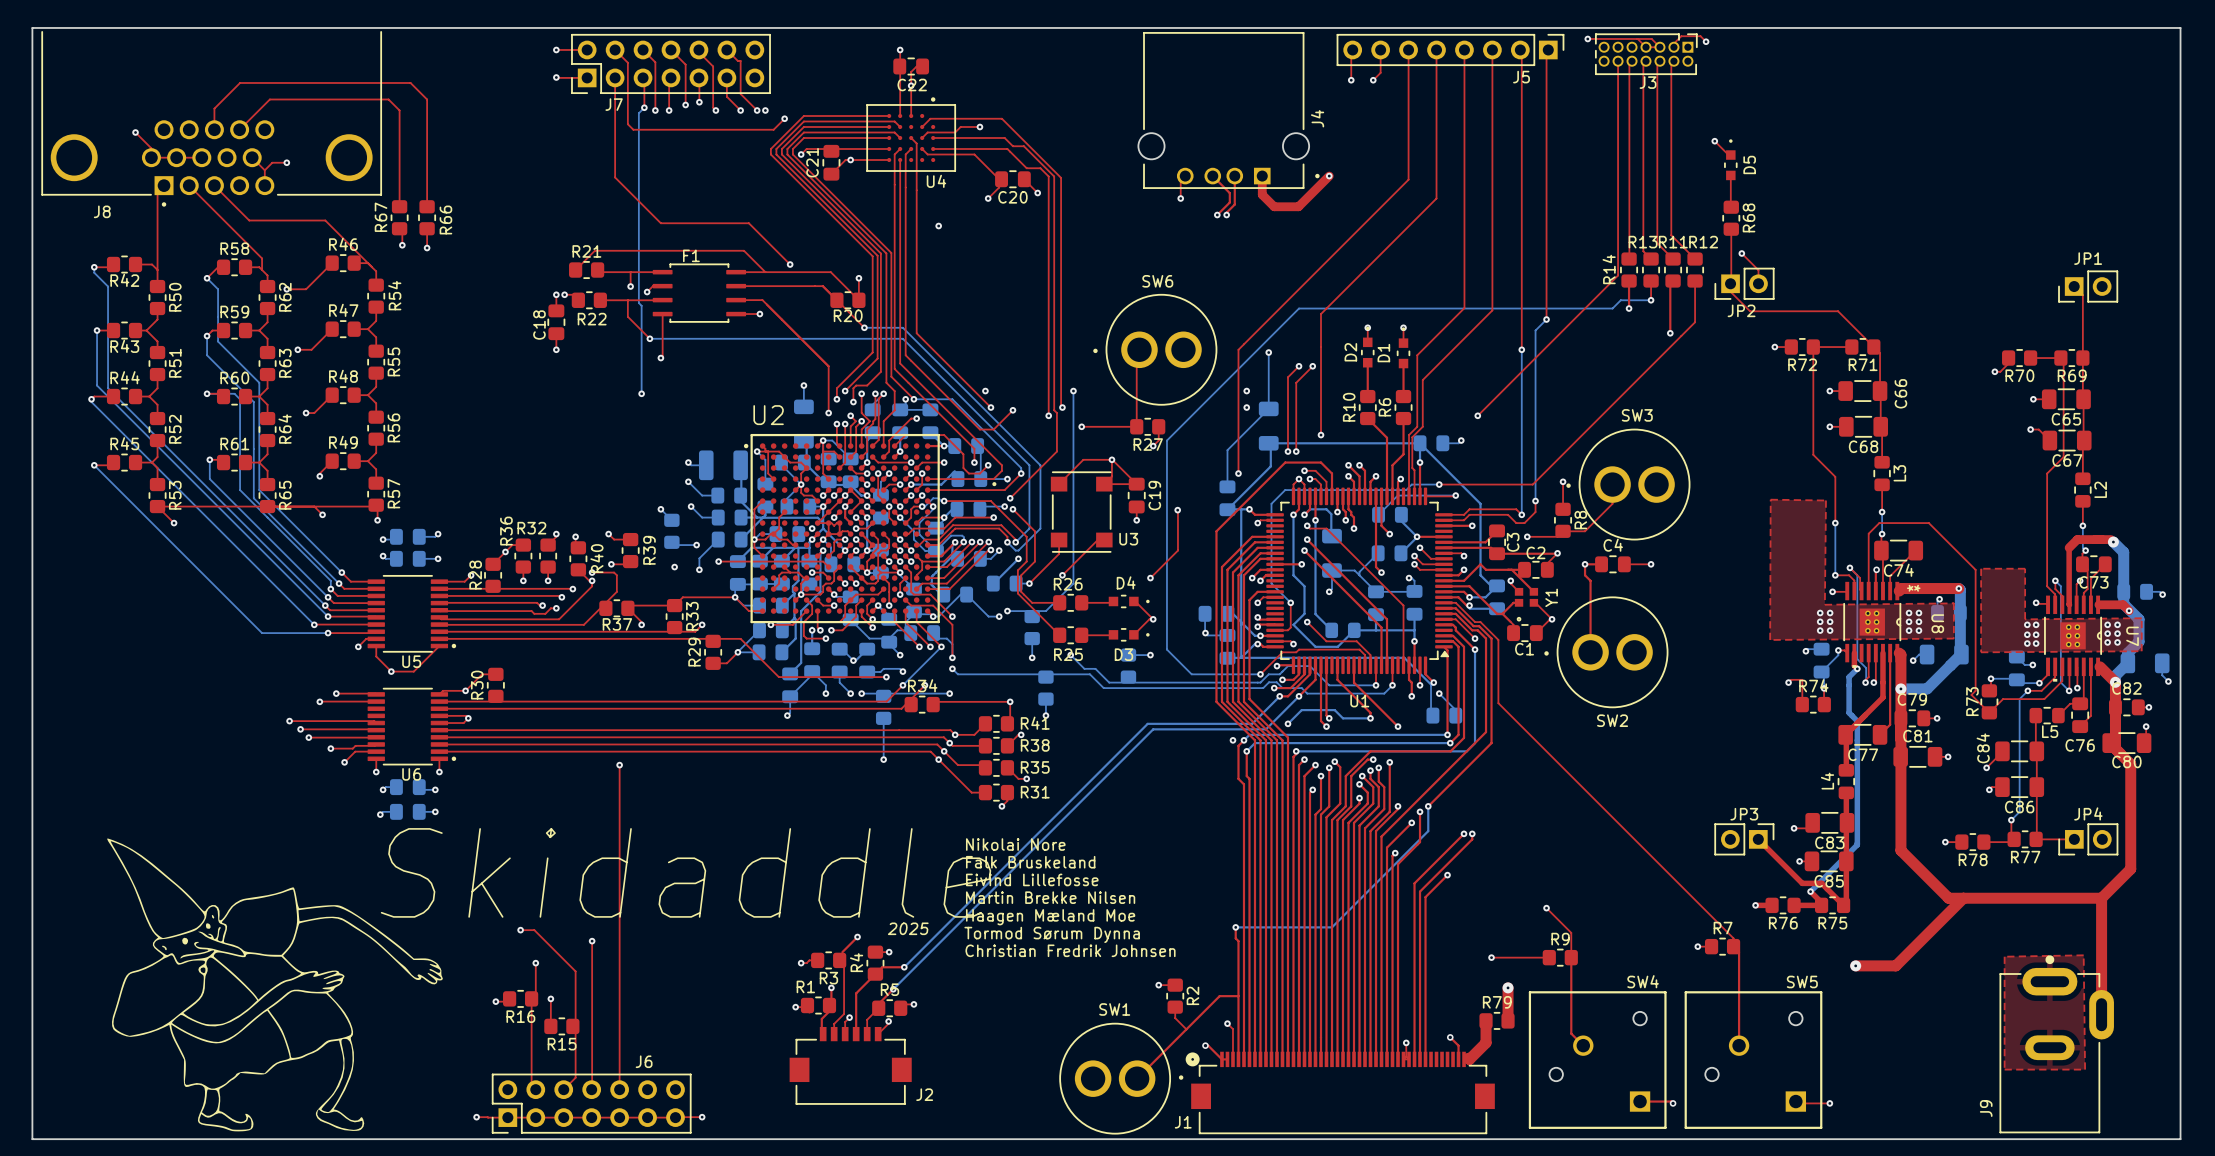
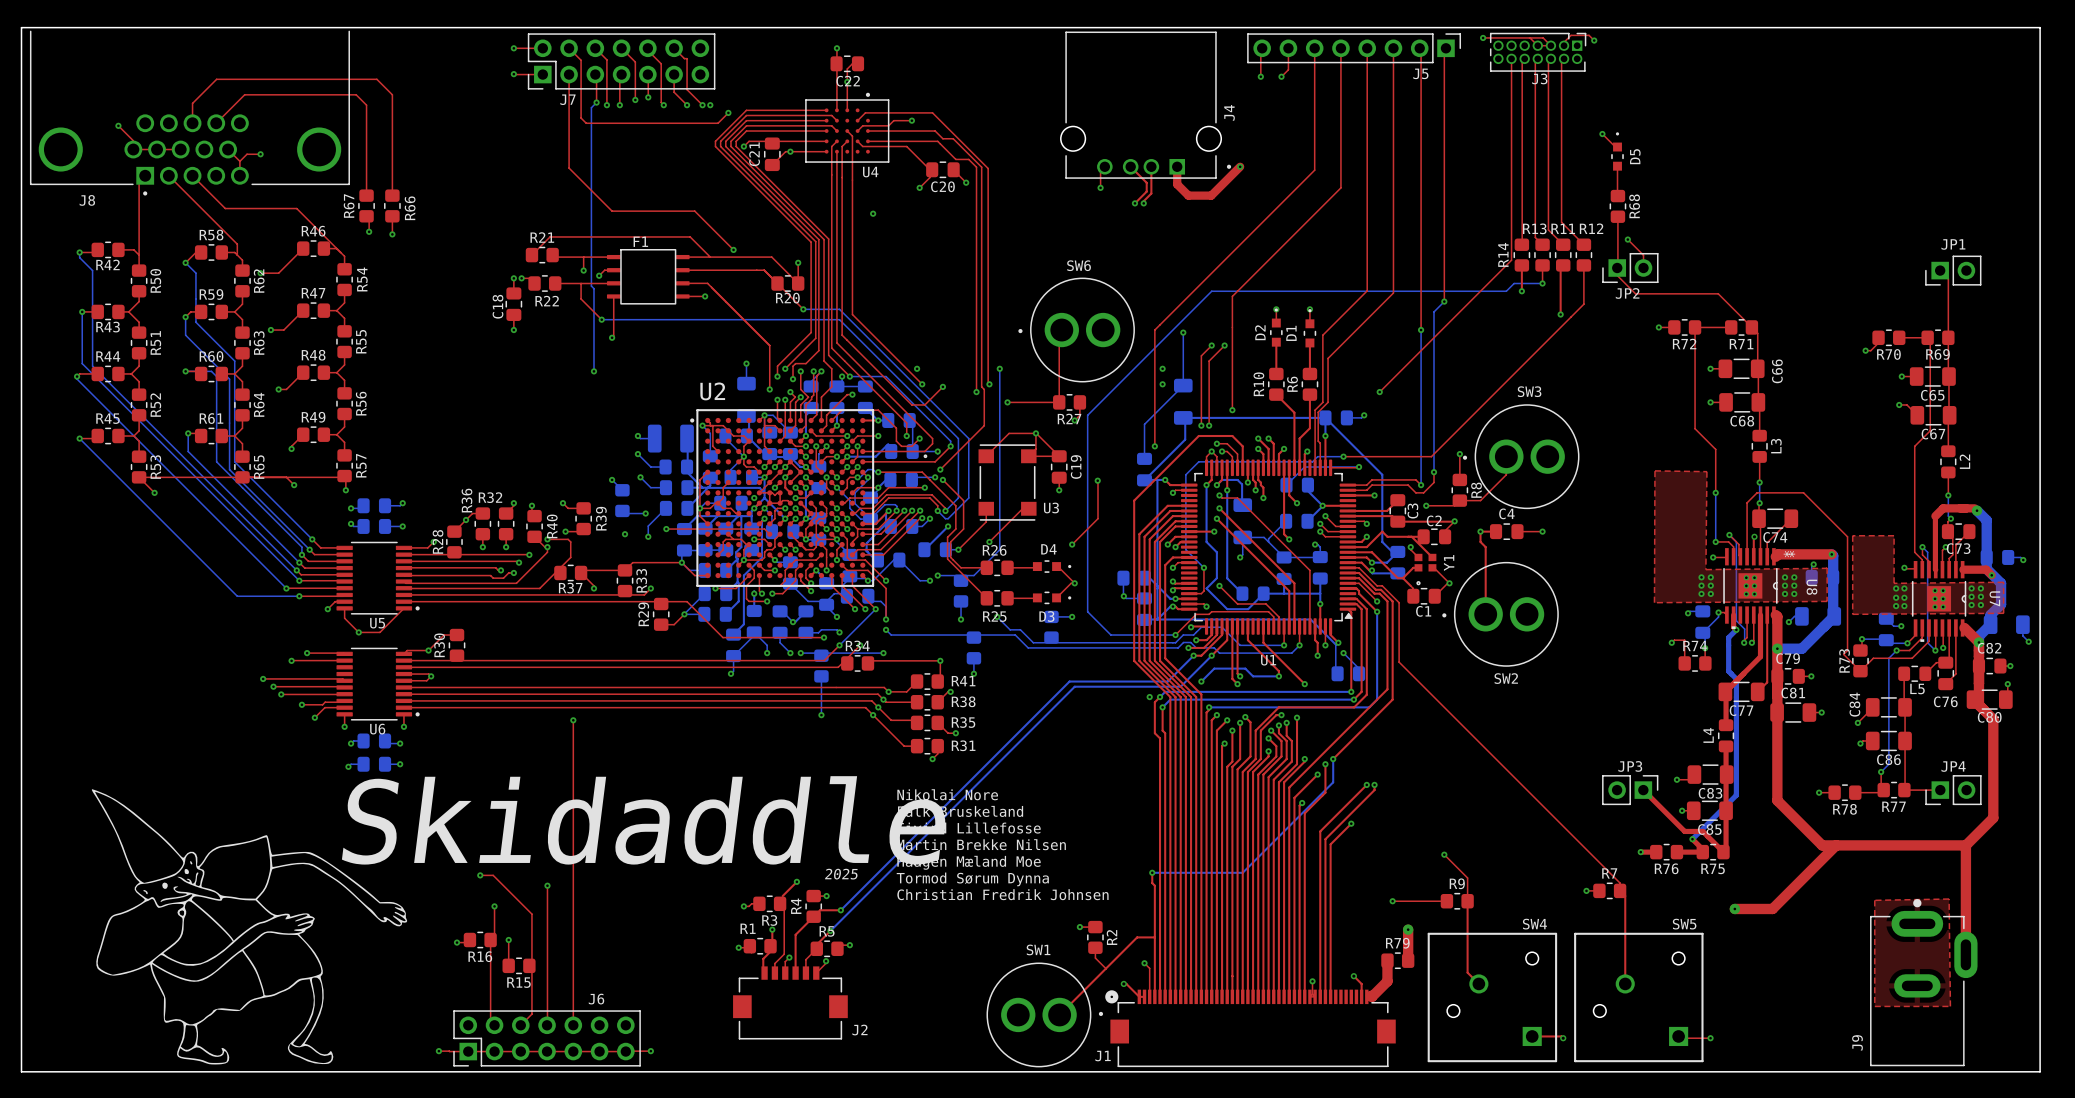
F1 footprint: [652, 263, 747, 323] -> [606, 249, 690, 305]

